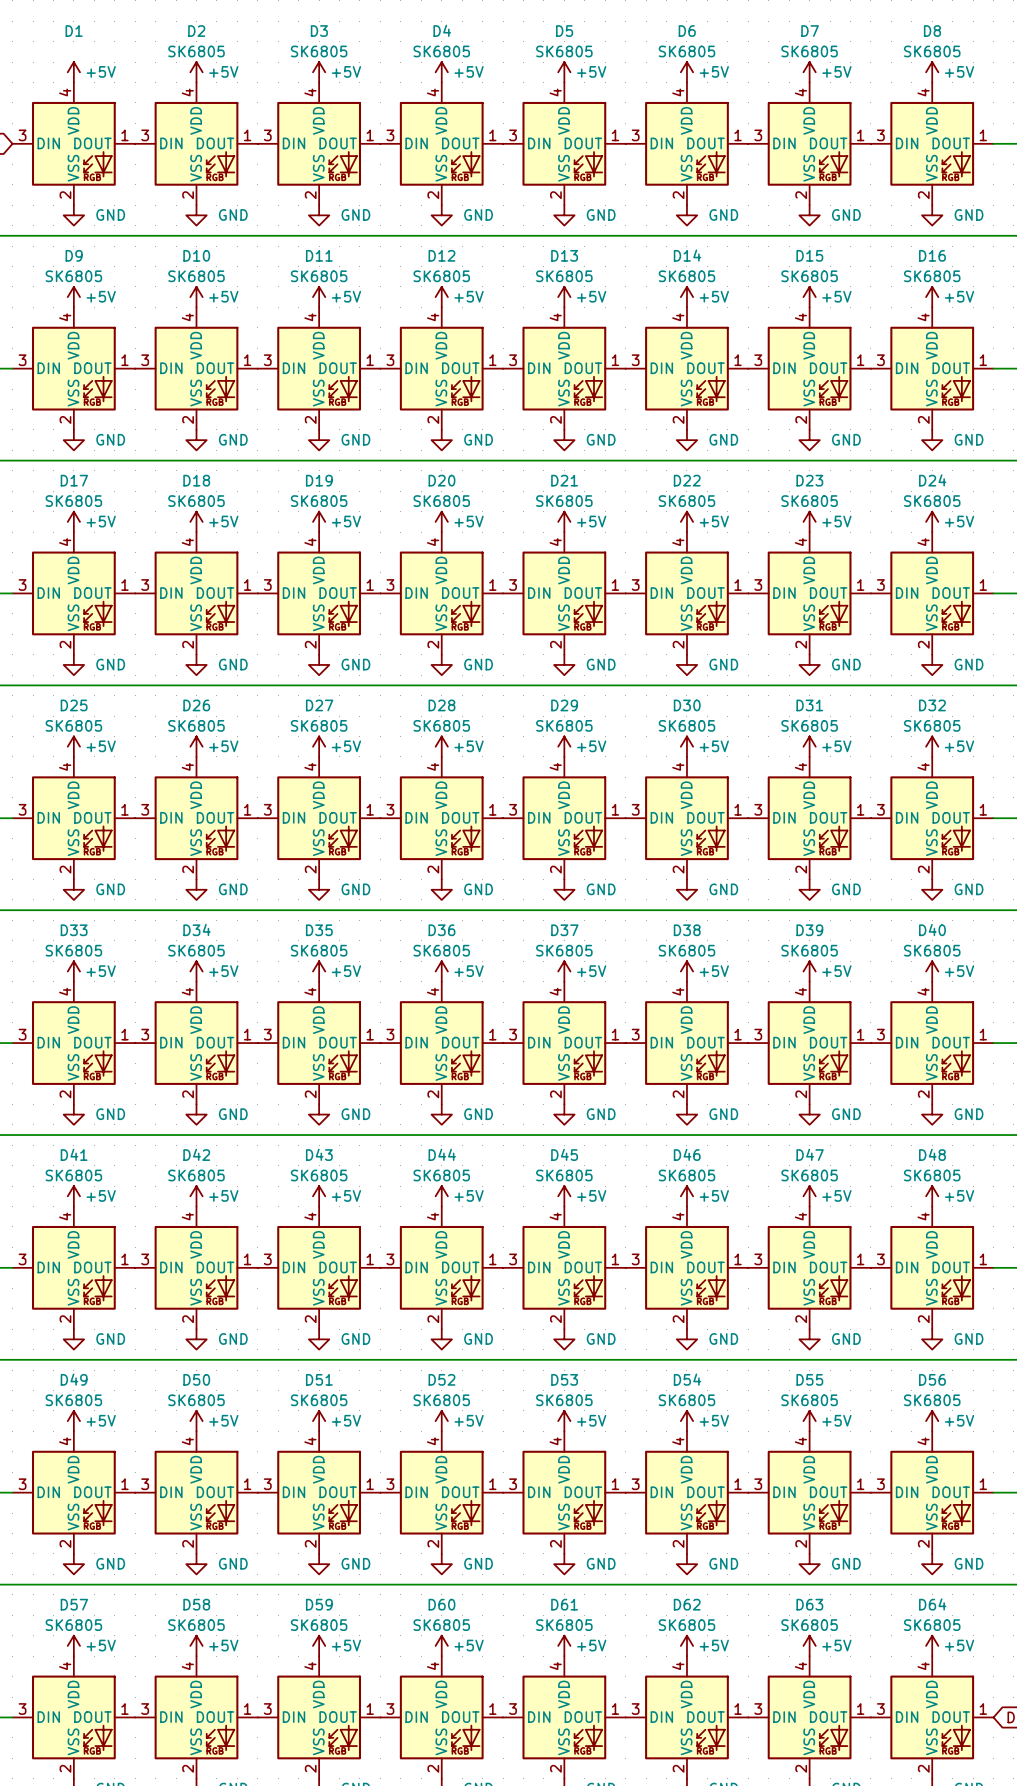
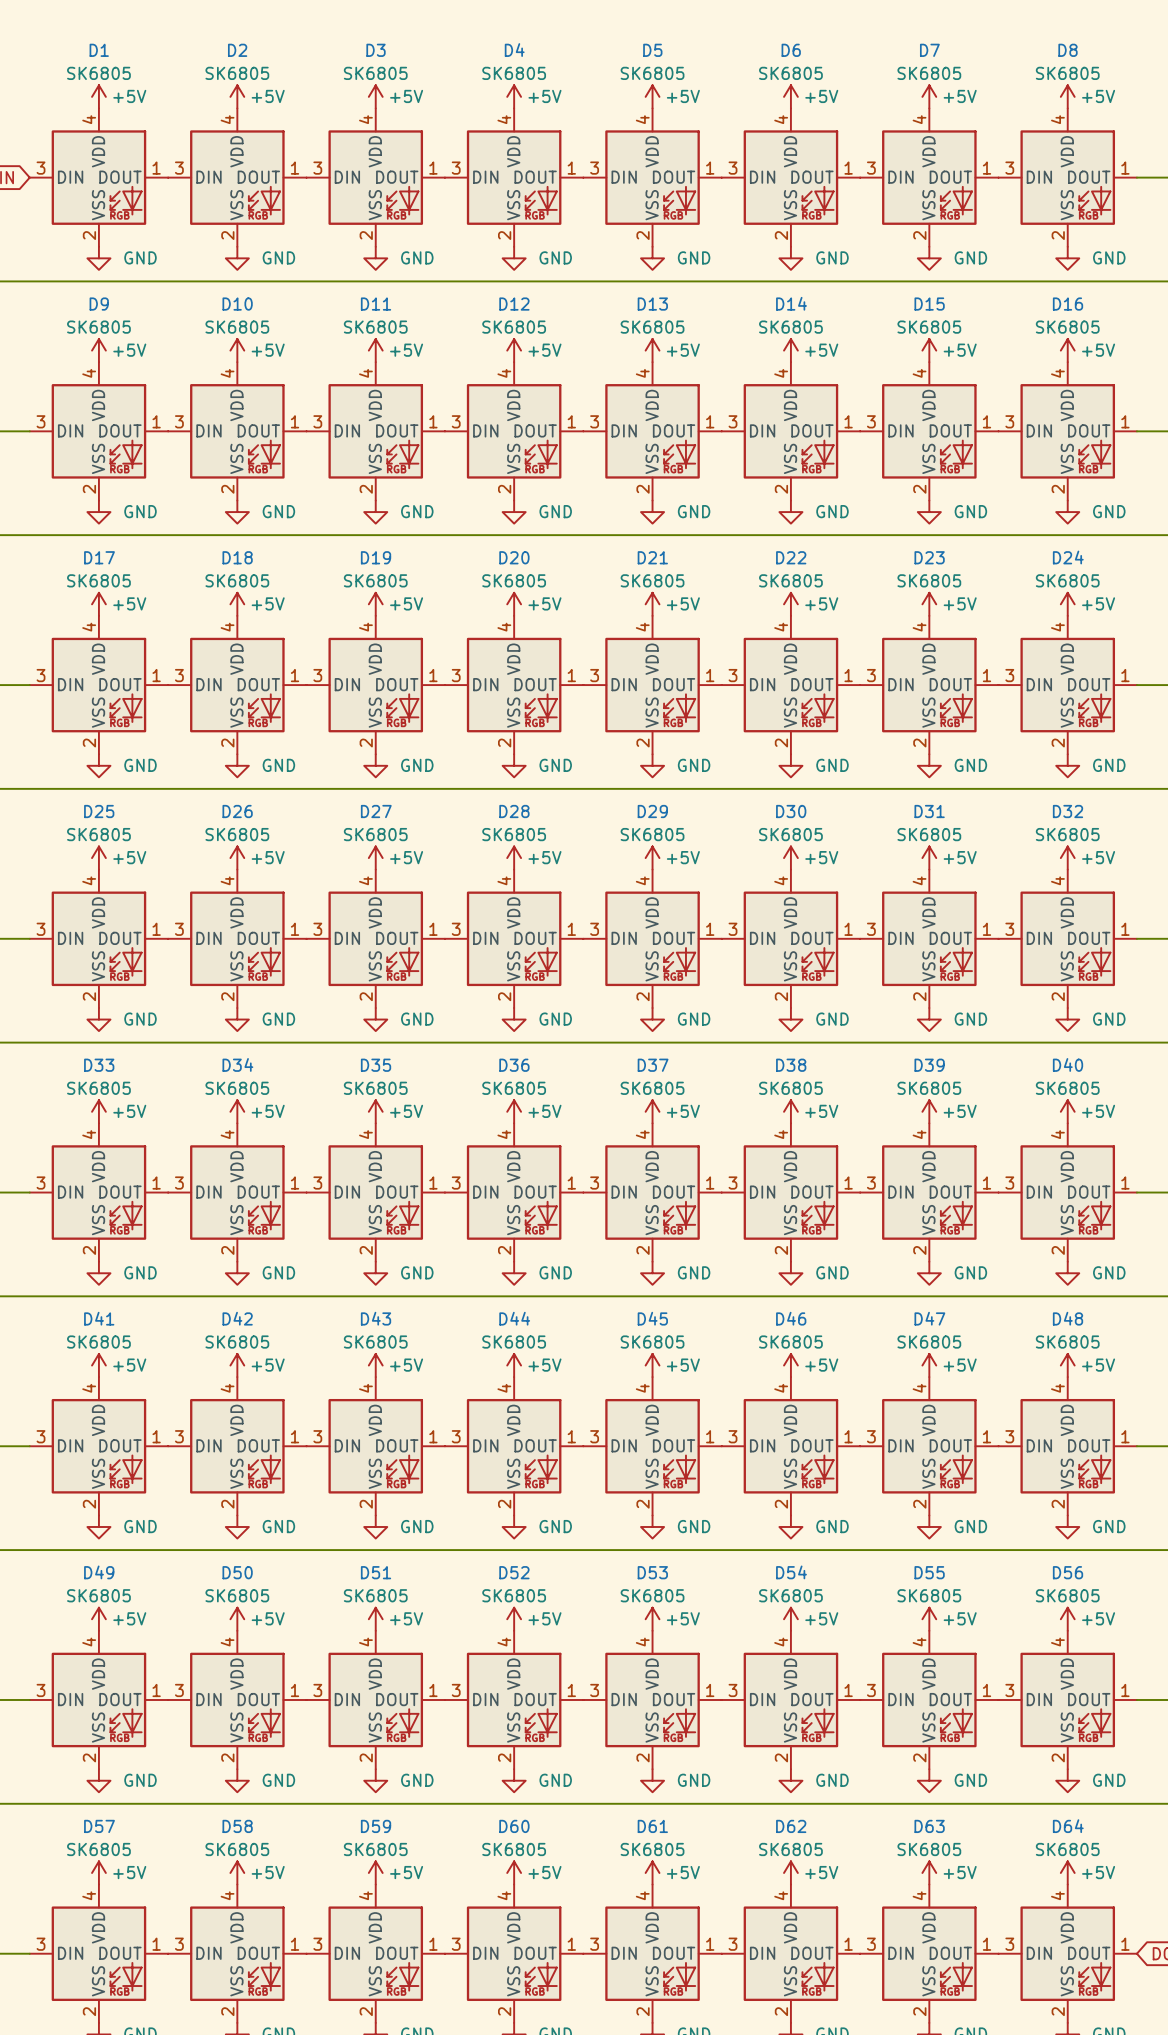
D1 value: none -> SK6805 (98, 73)

